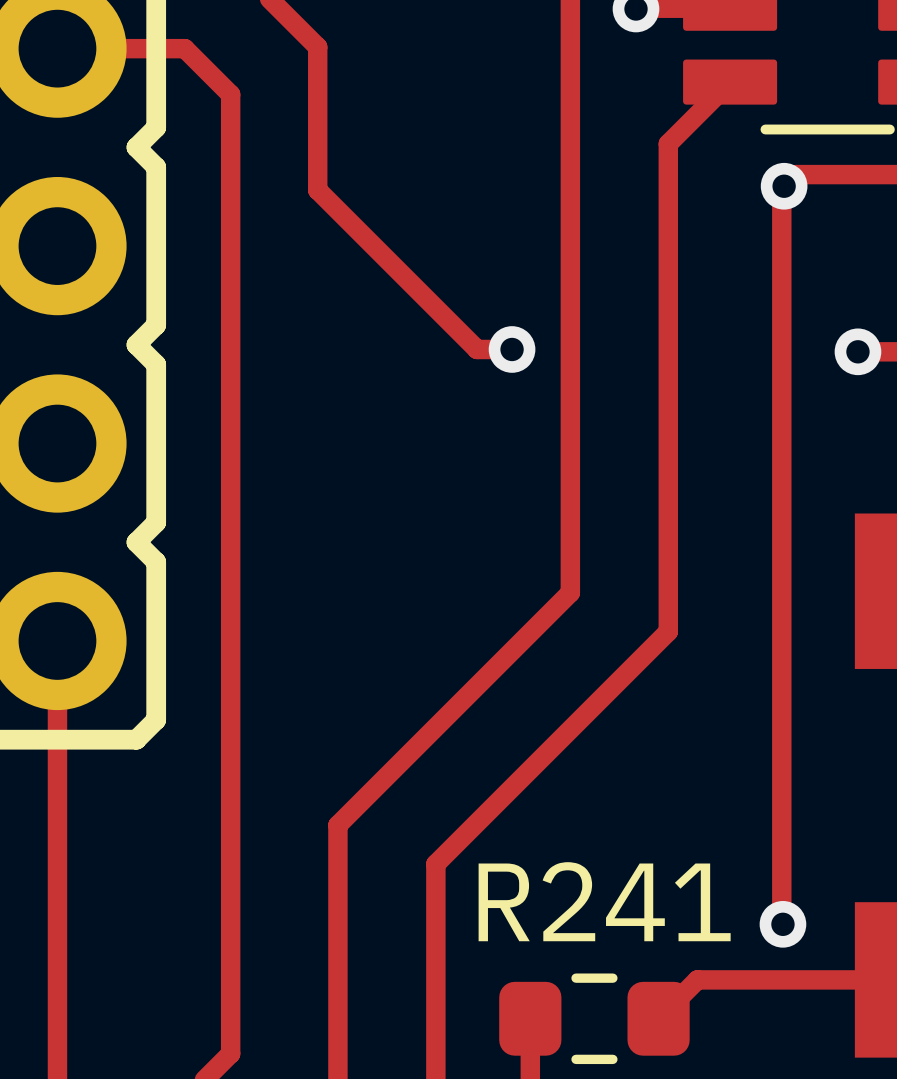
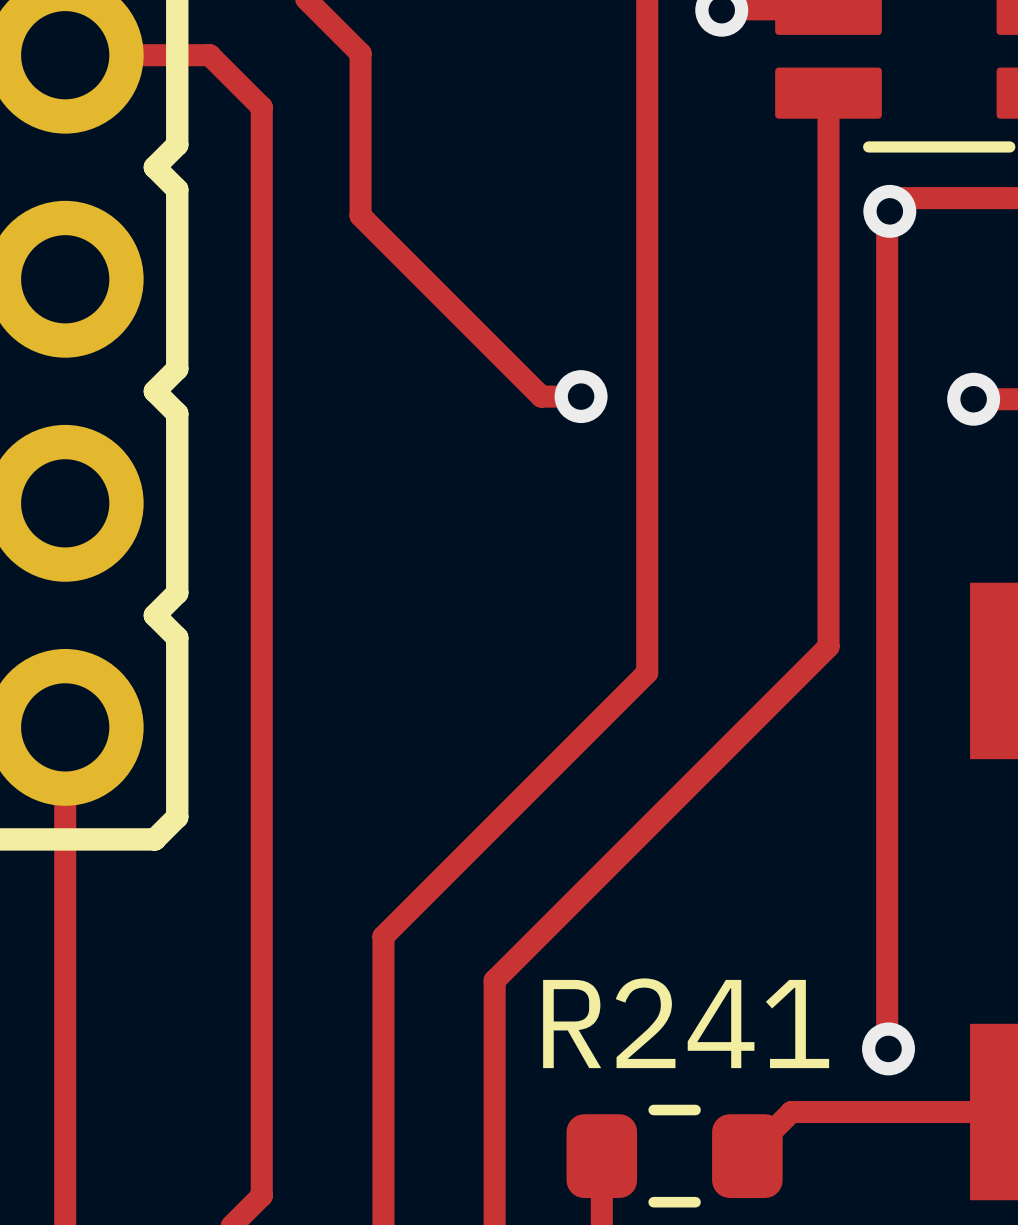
track: (730, 82) (668, 143) (668, 631) -> (828, 93) (828, 646) (758, 716)

